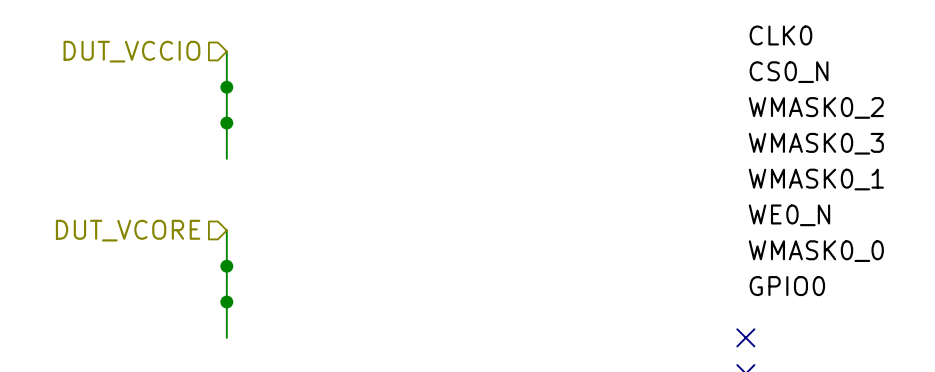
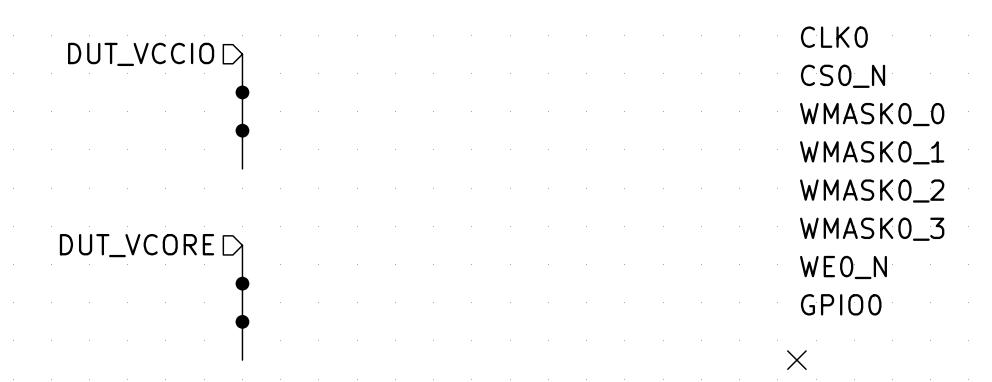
label: WMASK0_2 (816, 107) -> WMASK0_0 (872, 114)
label: WMASK0_3 (816, 143) -> WMASK0_1 (872, 152)
label: WMASK0_1 (816, 179) -> WMASK0_2 (872, 191)
label: WE0_N (789, 215) -> WMASK0_3 (872, 229)
label: WMASK0_0 (816, 251) -> WE0_N (843, 267)

